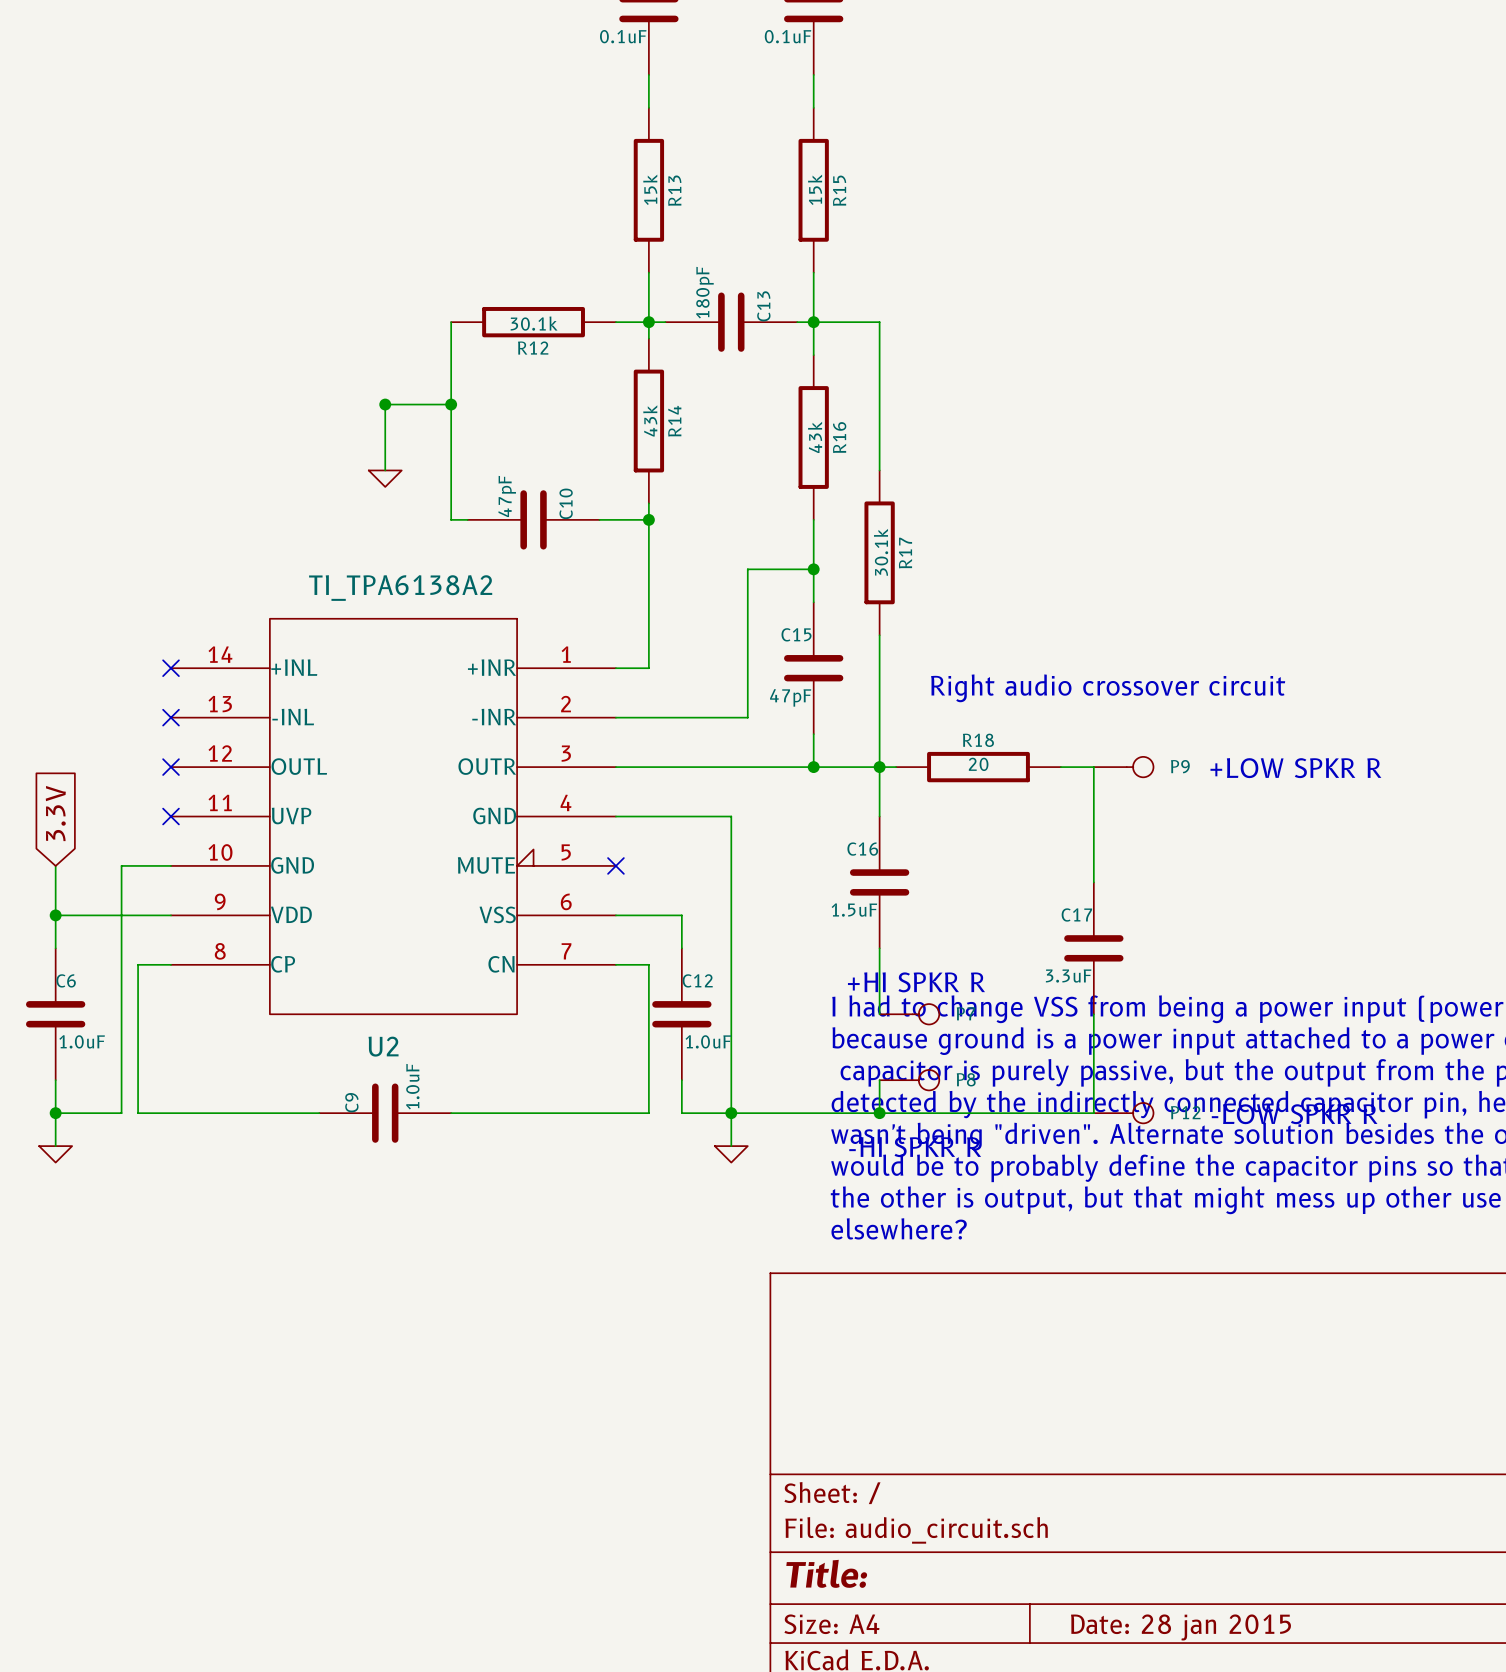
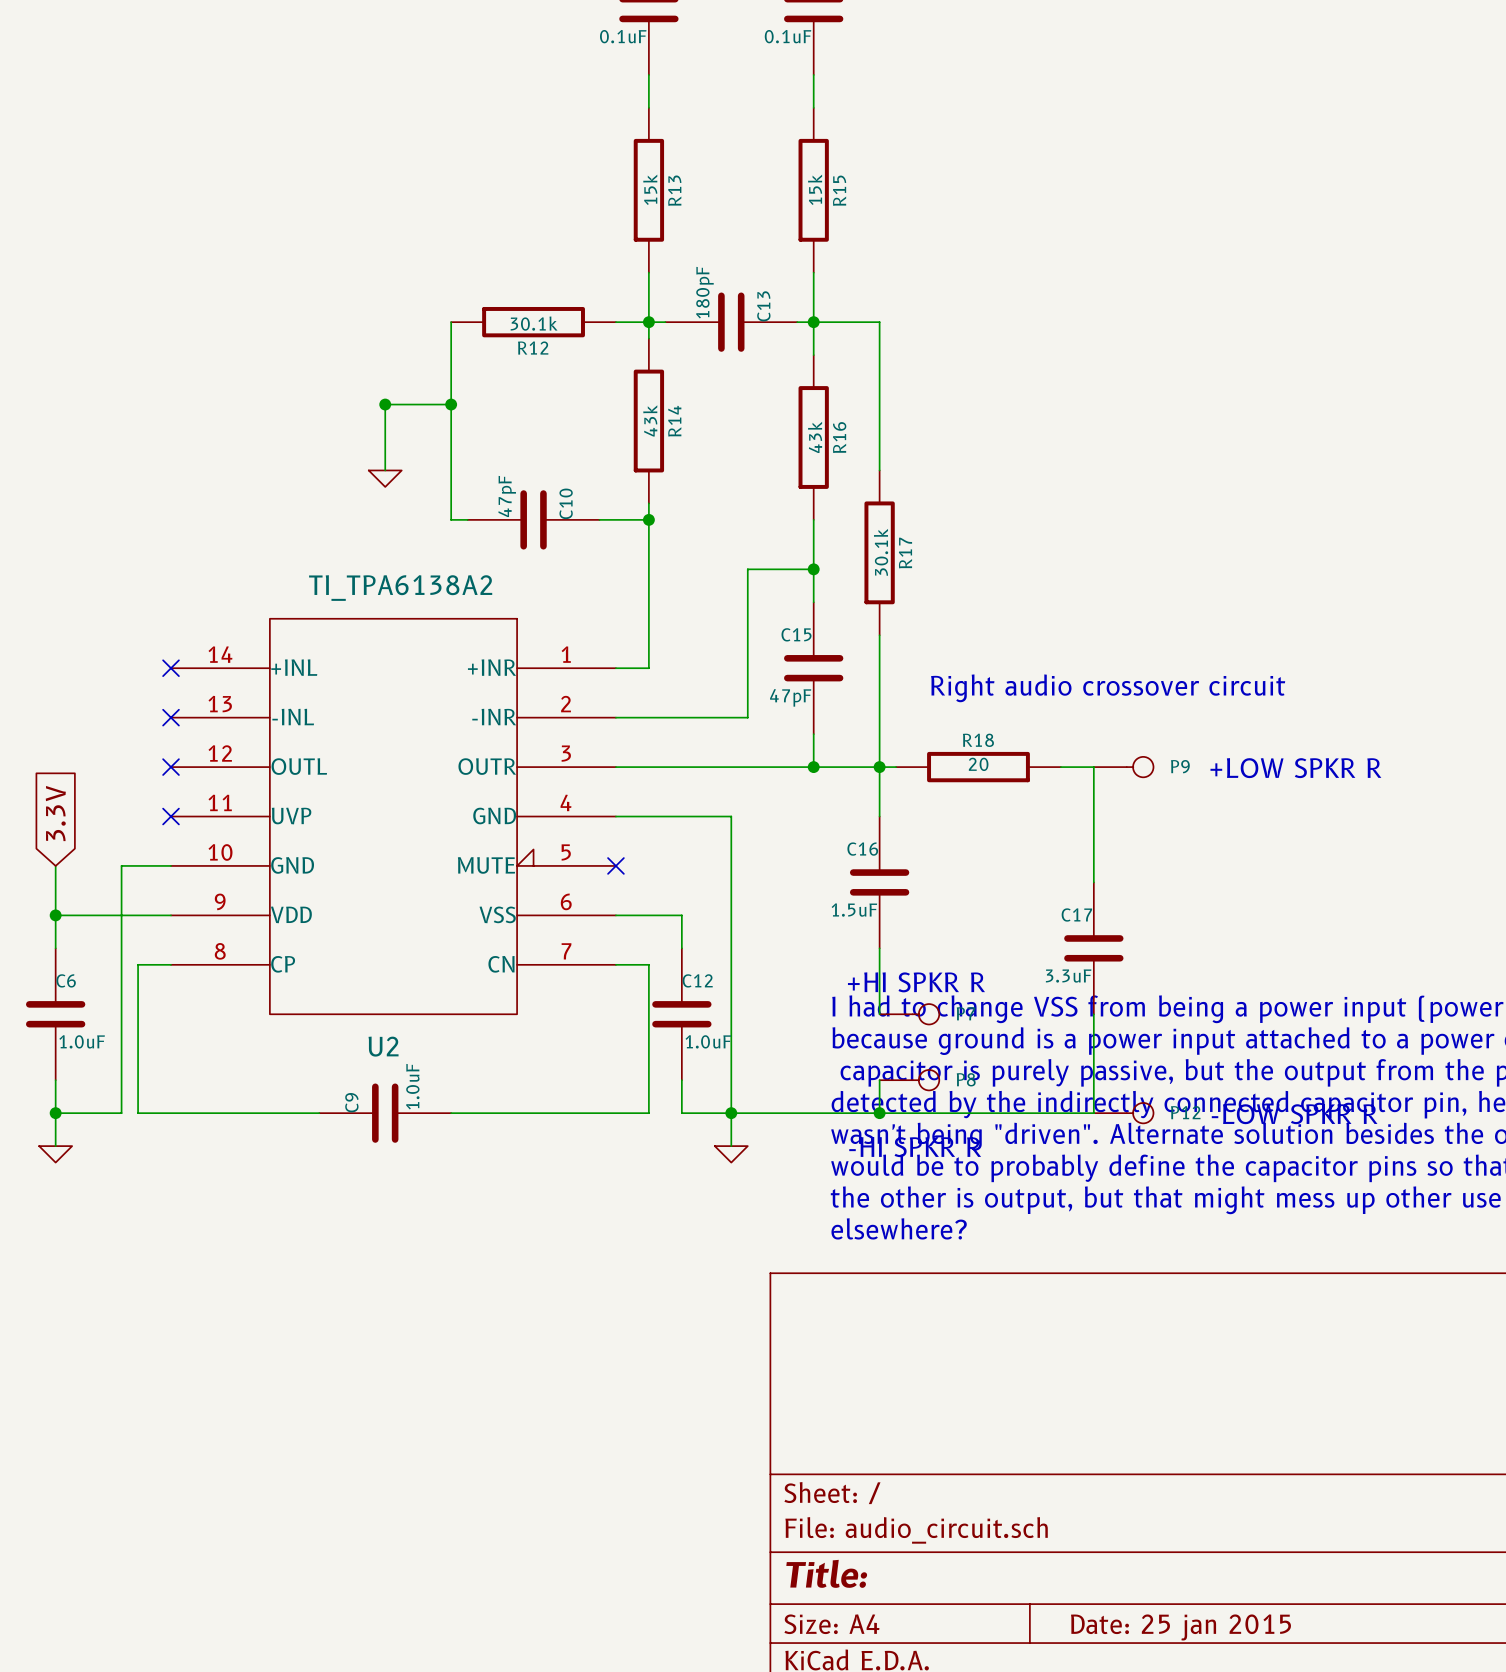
title block: Date: 28 jan 2015 (1180, 1627) -> Date: 25 jan 2015 (1180, 1627)

